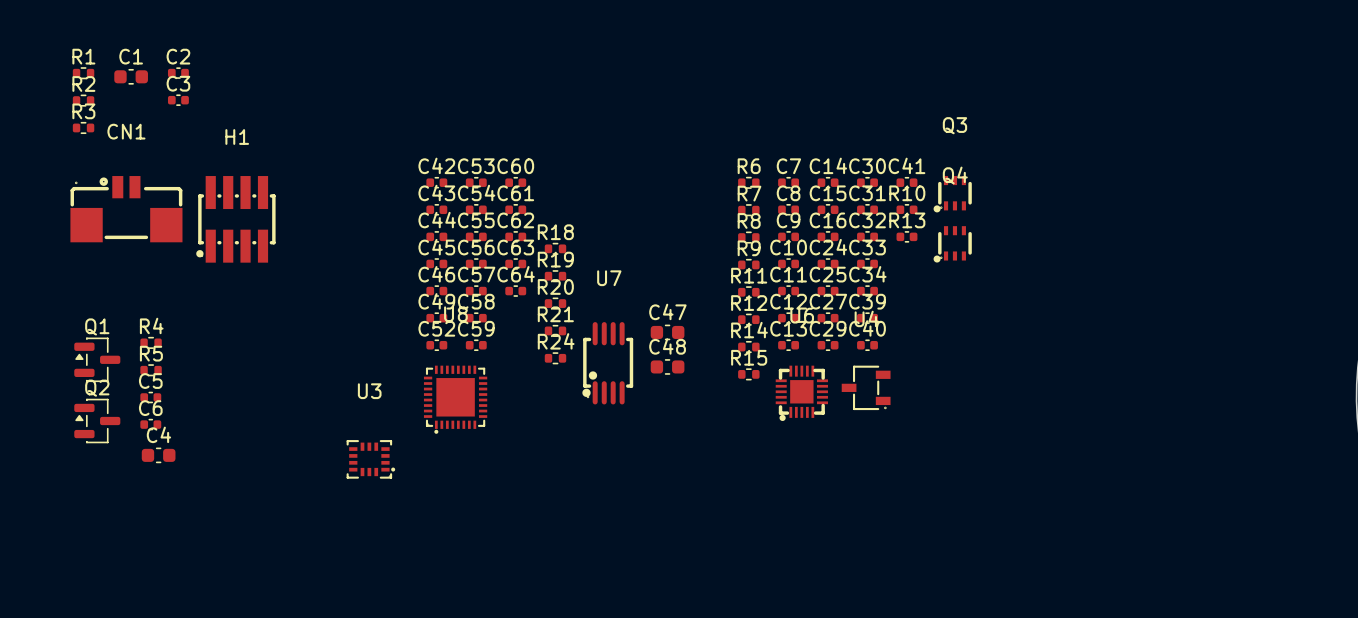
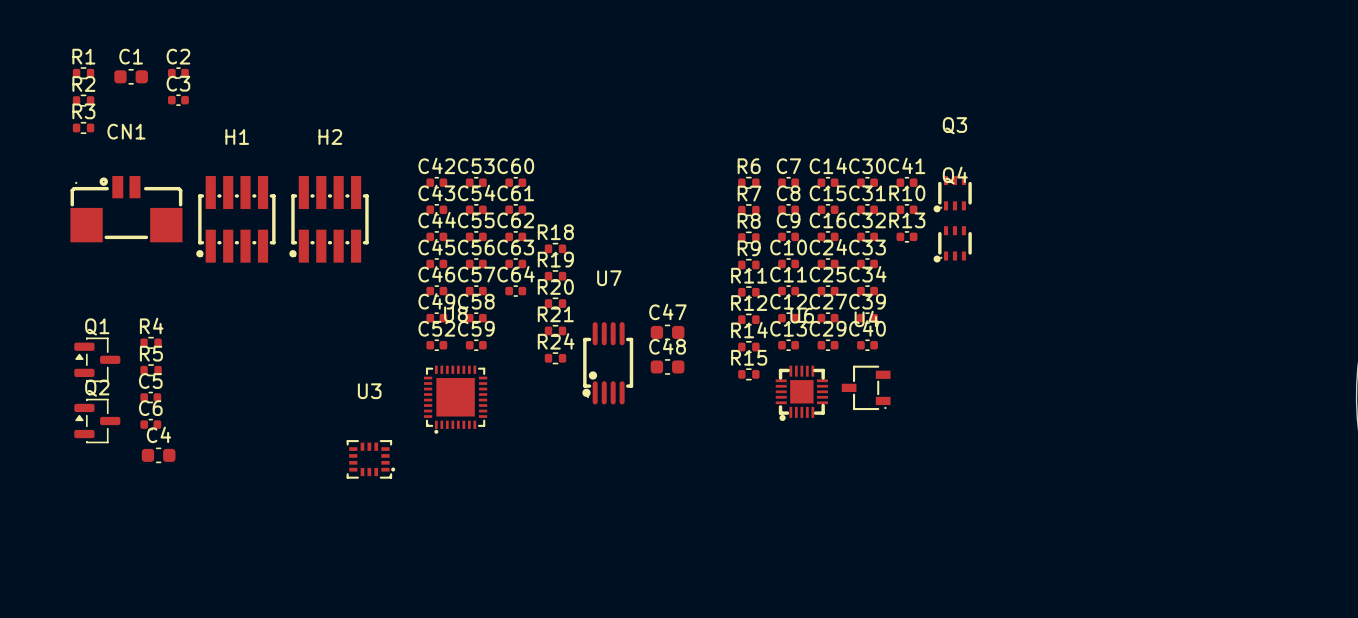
H2: none -> (329, 219)

